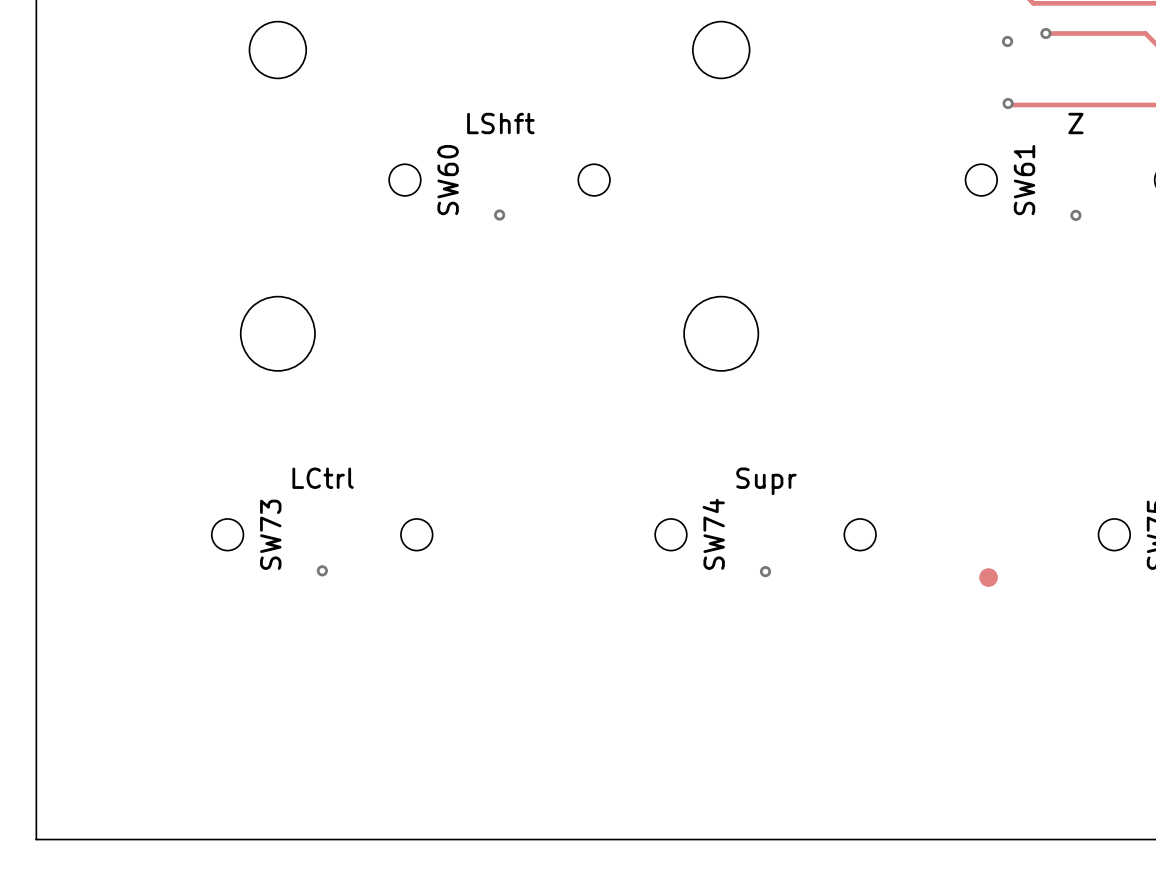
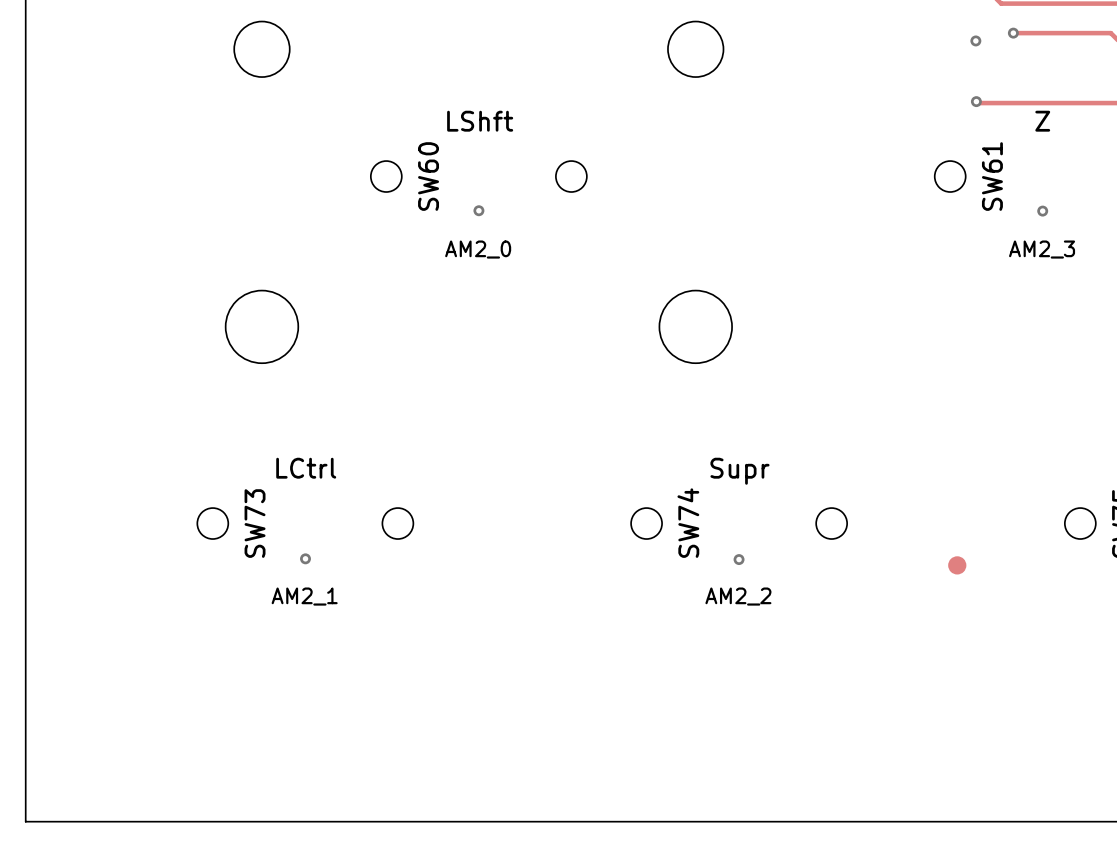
text: none -> AM2_0 (478, 249)
text: none -> AM2_3 (1042, 249)
text: none -> AM2_1 (304, 596)
text: none -> AM2_2 (738, 596)

